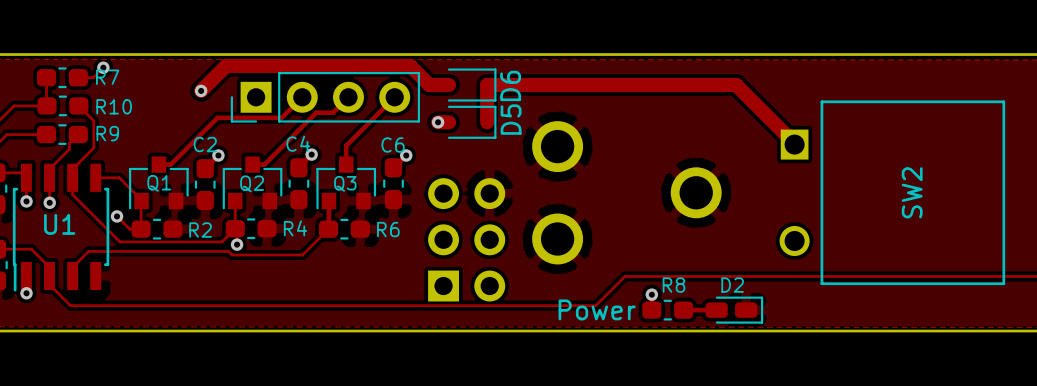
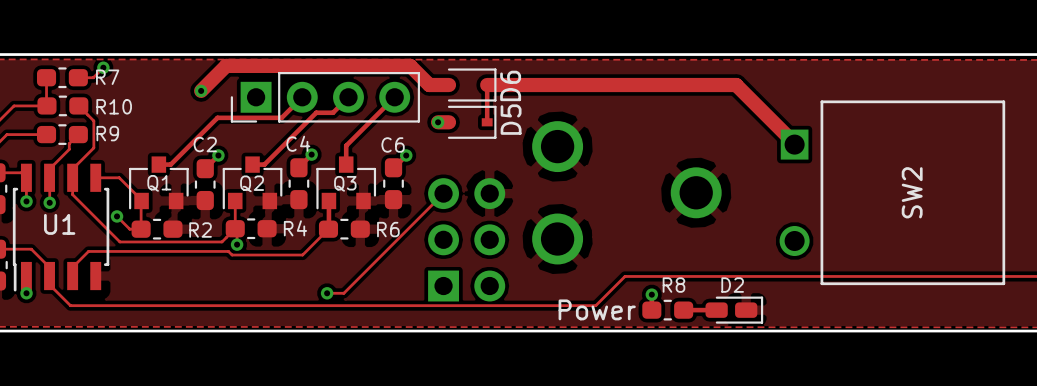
track width: thick (487, 85) (487, 122) -> thin (487, 85) (487, 122)
track: none -> (443, 193) (343, 293) (327, 293)
via: none -> (327, 293)

